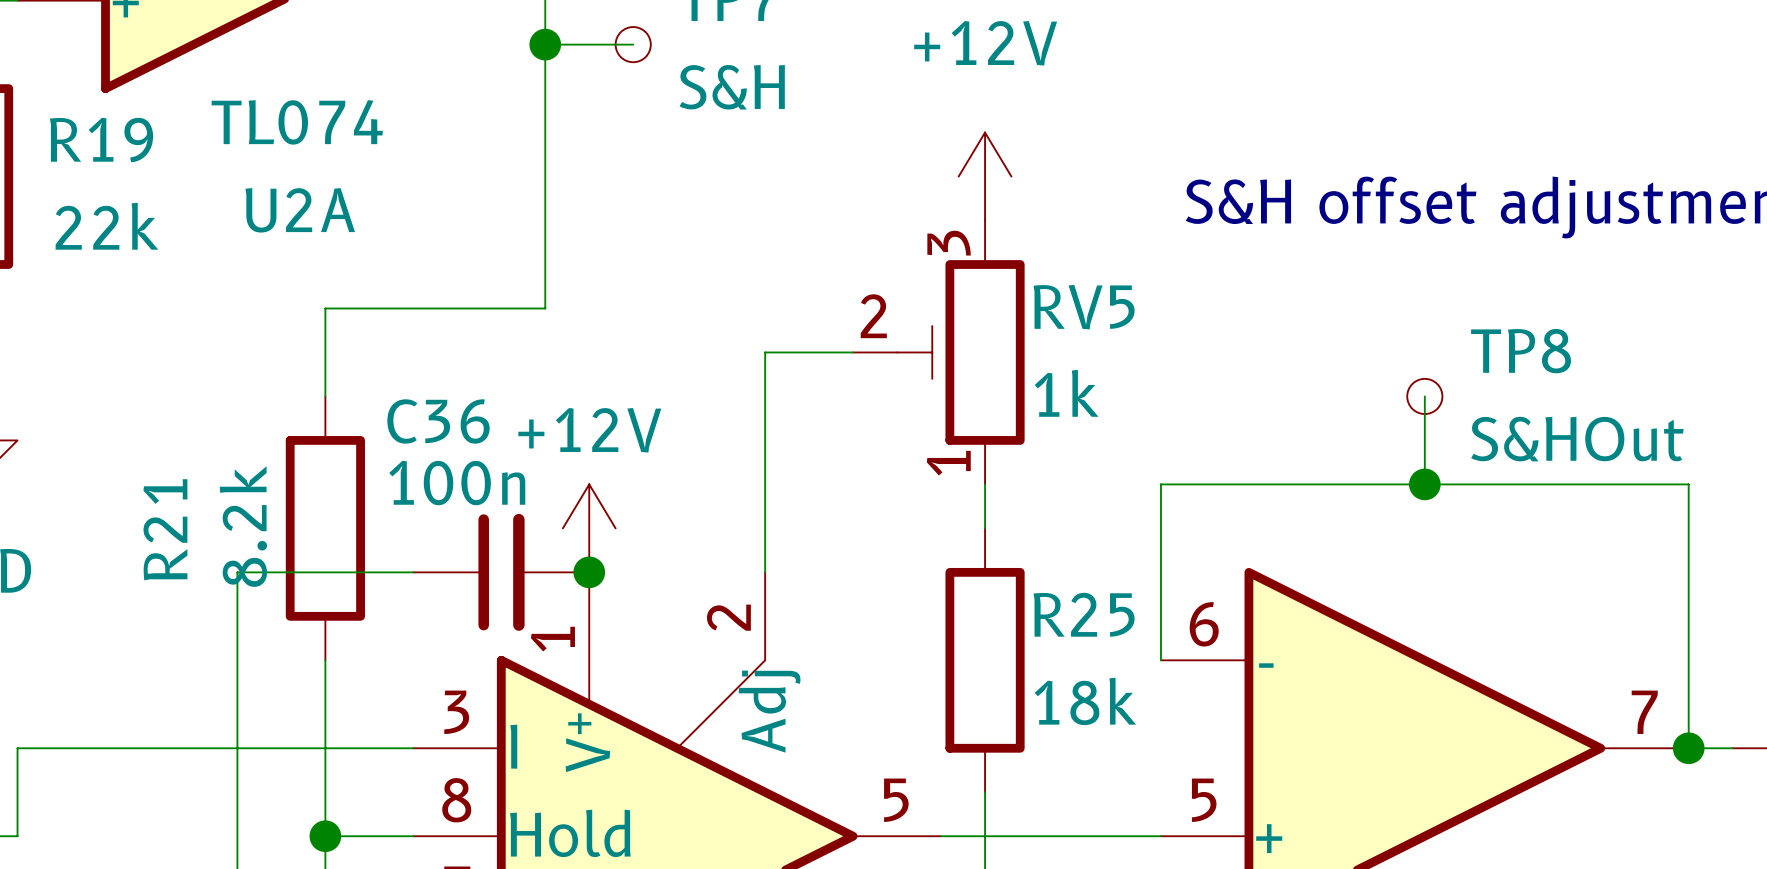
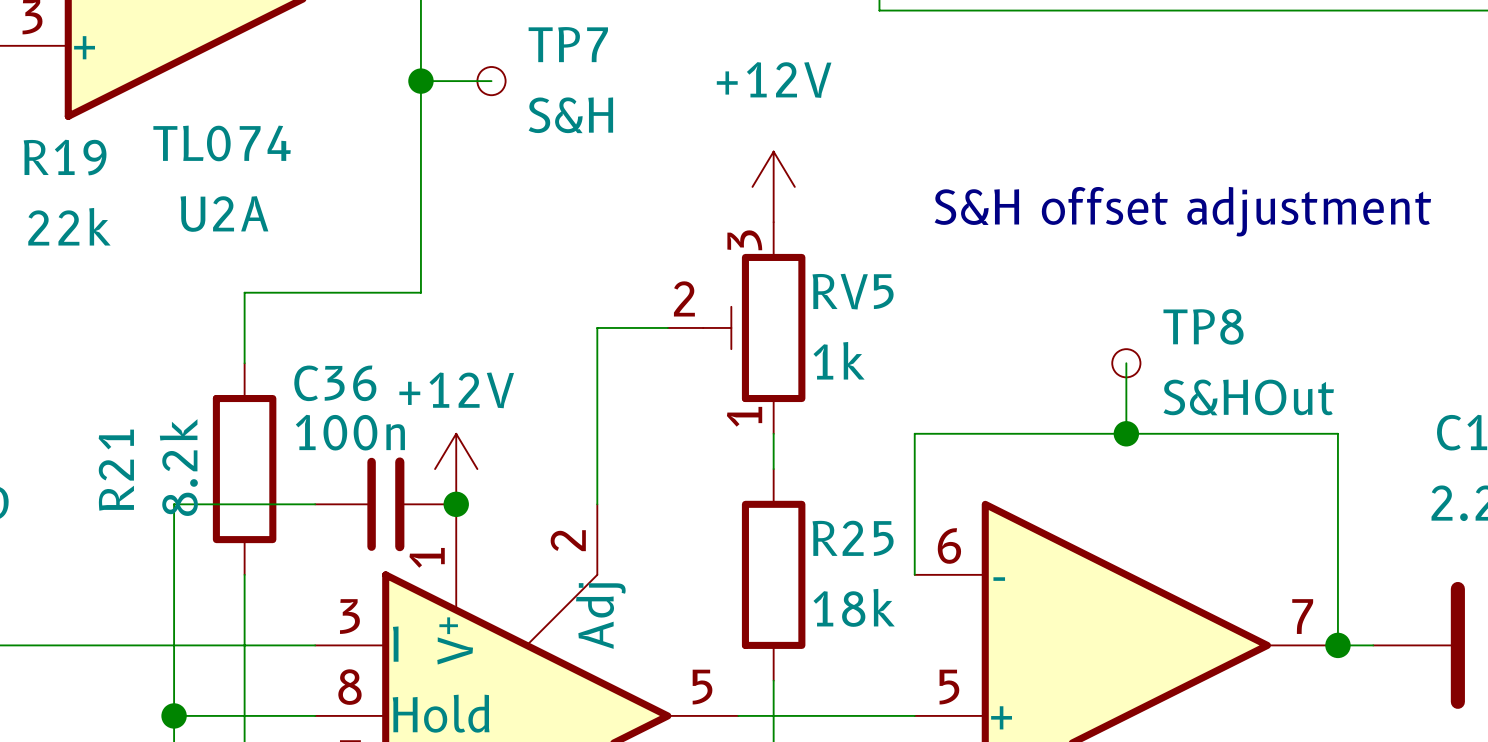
wire: none -> (174, 715) (244, 715)
junction position: (325, 836) -> (174, 715)

